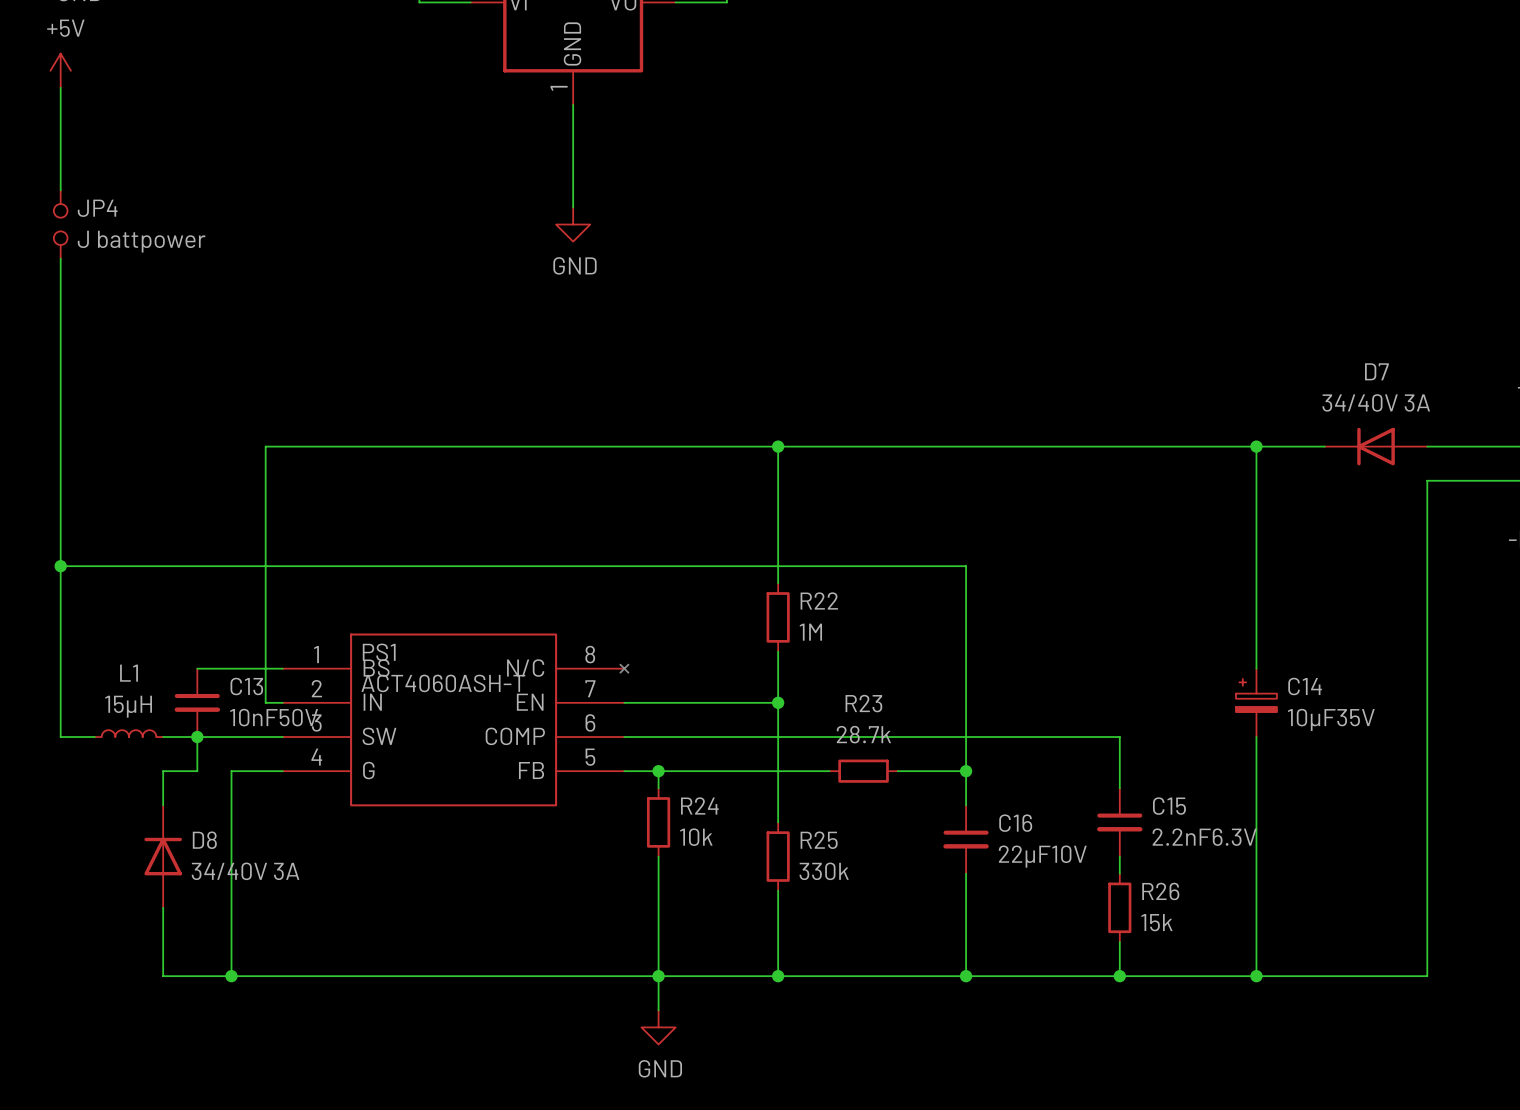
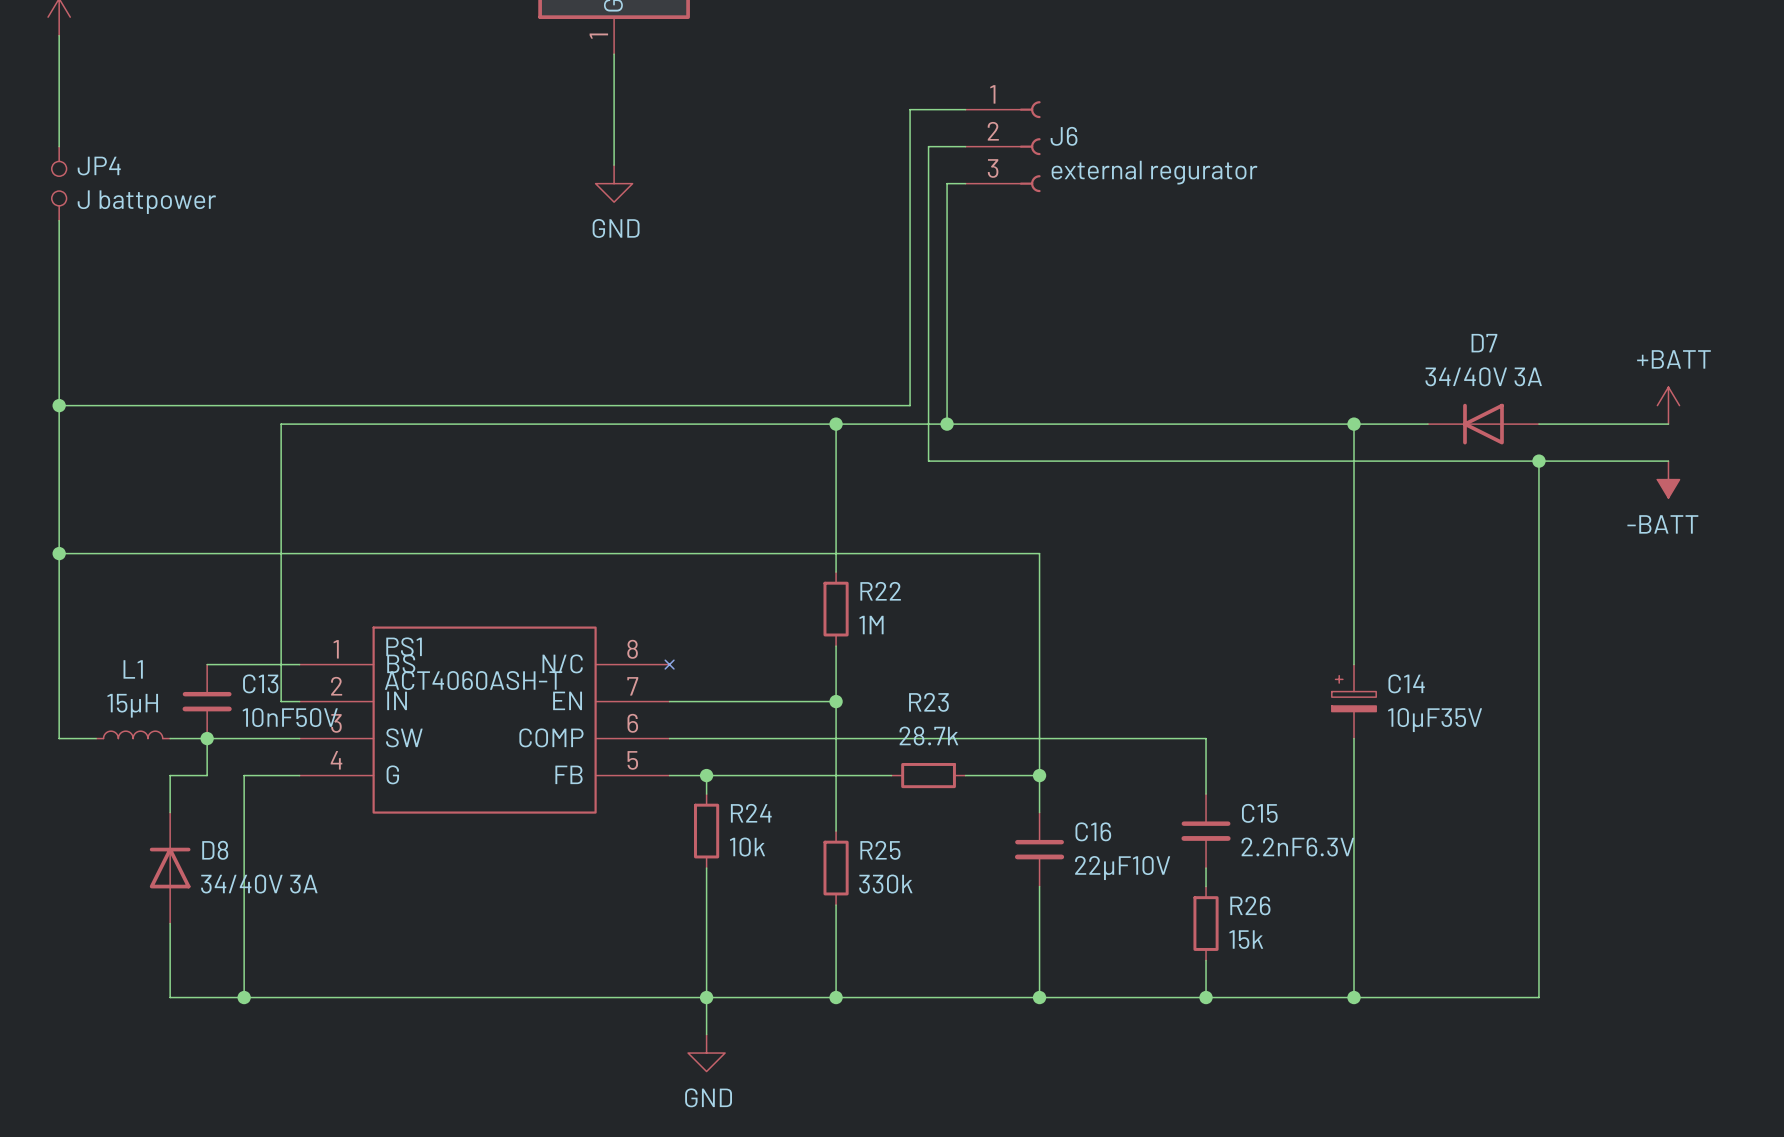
wire: none -> (965, 109) (910, 109) (910, 405) (59, 405)
wire: none -> (965, 146) (928, 146) (928, 461) (1538, 461)
J6: none -> external regurator (1003, 146)
wire: none -> (965, 183) (947, 183) (947, 424)
junction: none -> (59, 405)
junction: none -> (947, 424)
junction: none -> (1538, 461)

